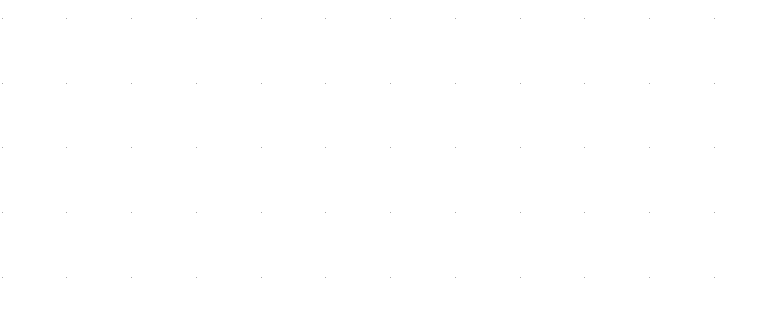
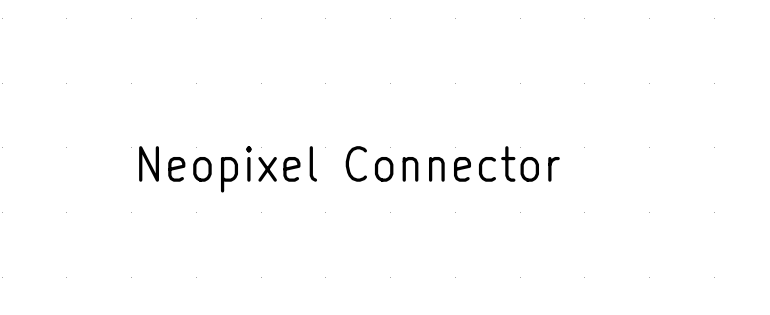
text: none -> Neopixel Connector (349, 169)

